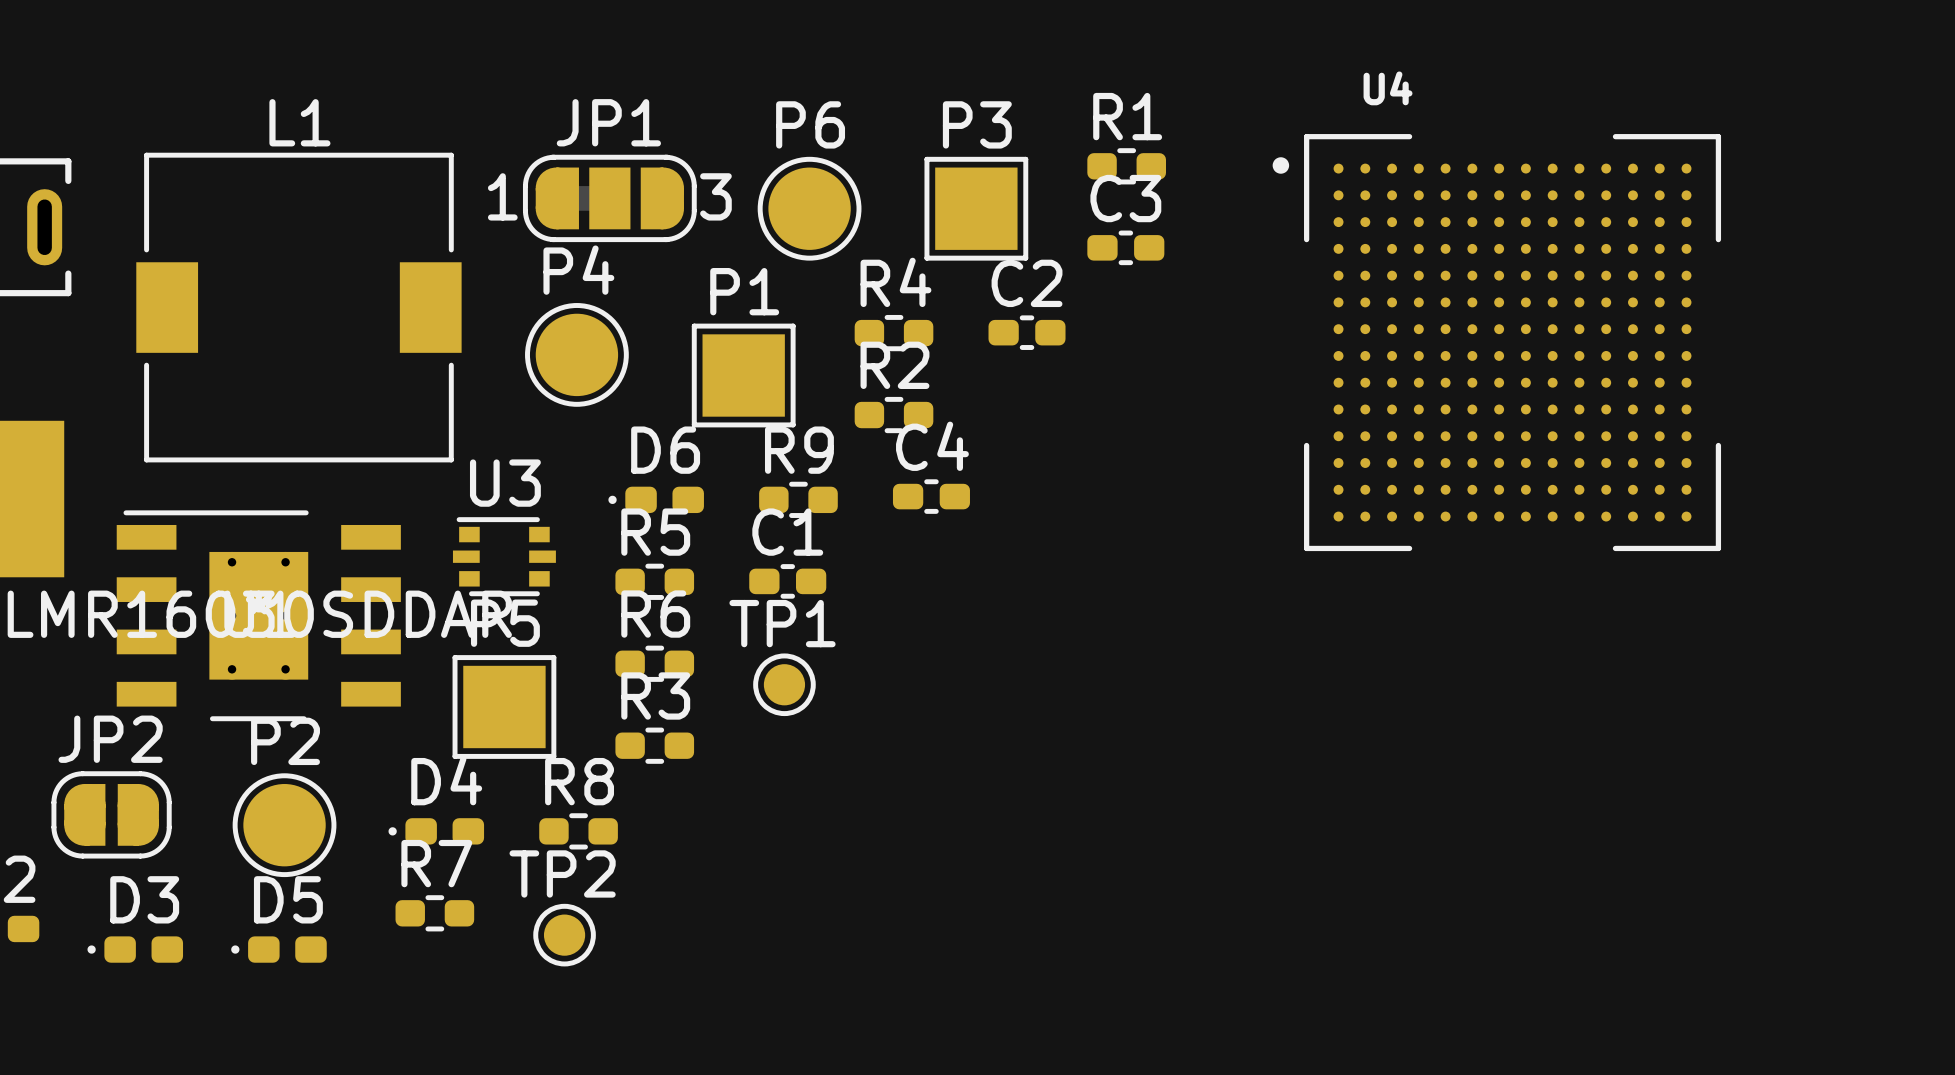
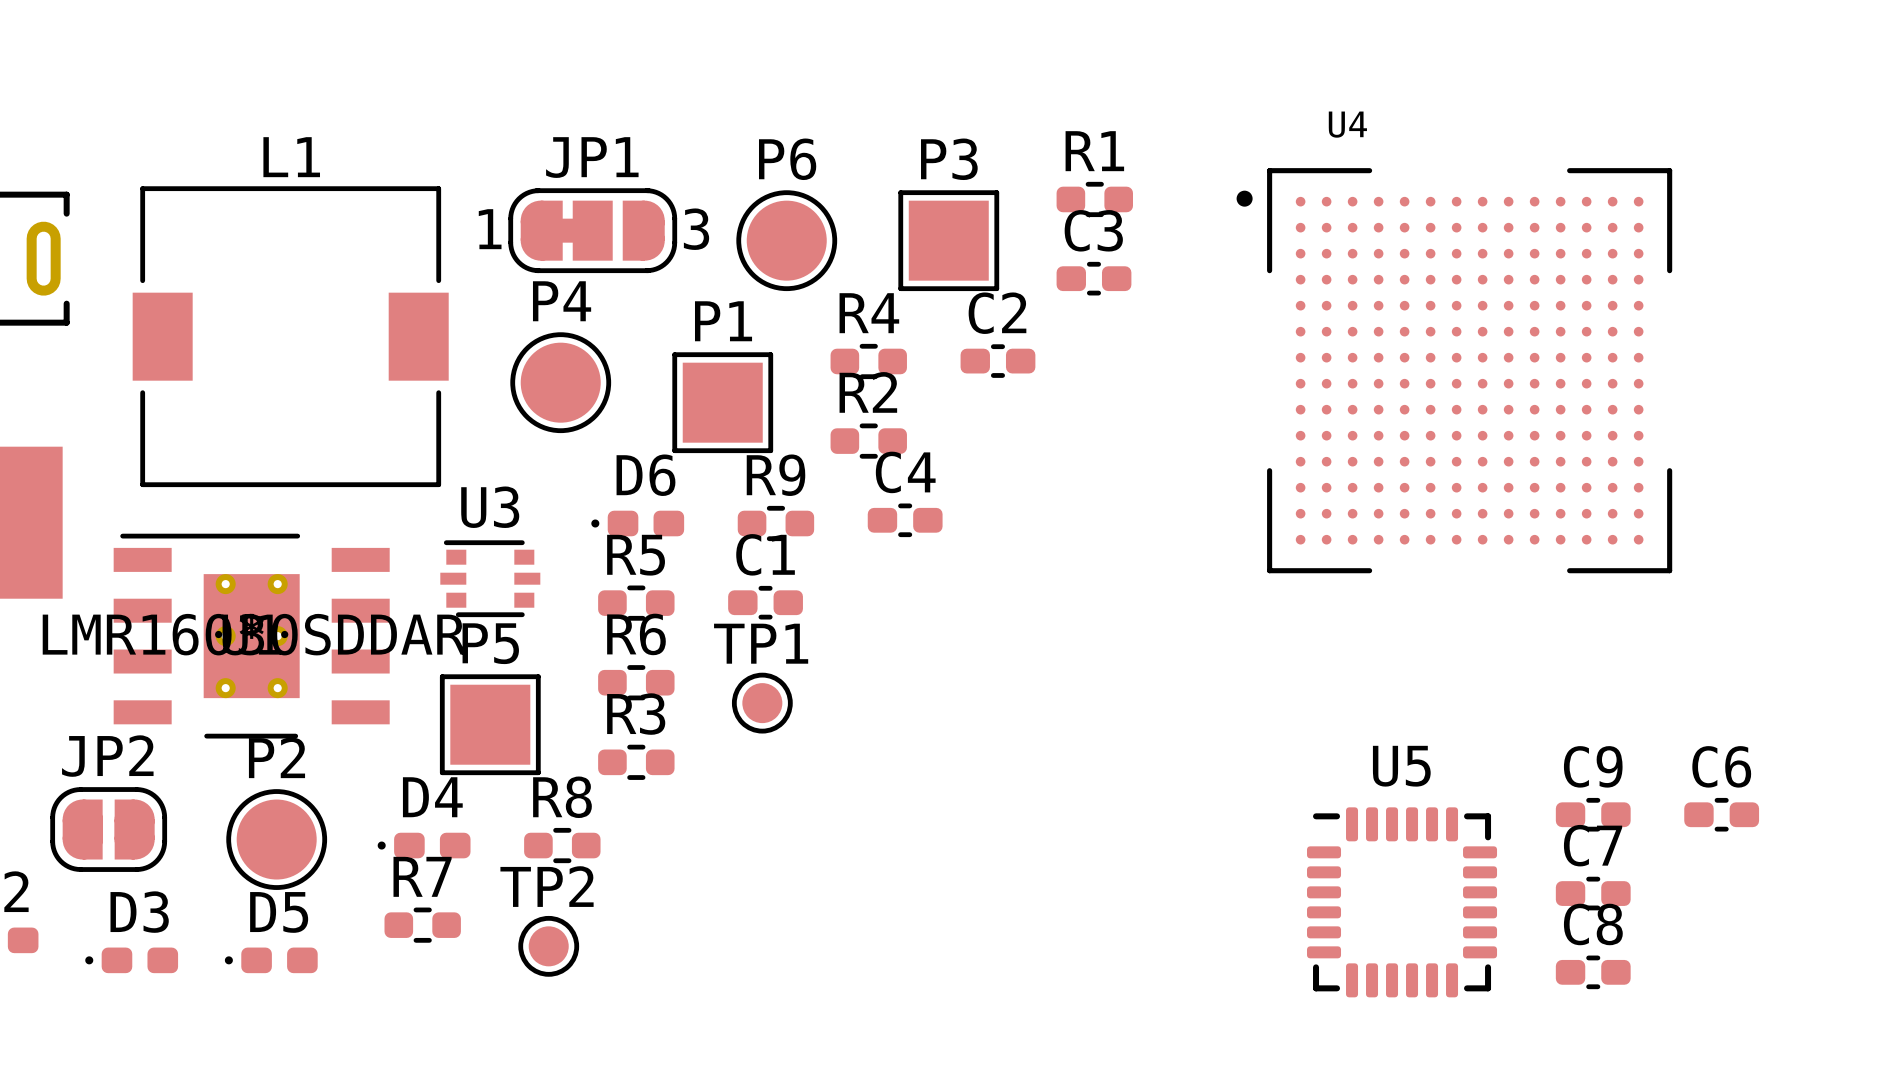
C9: none -> (1593, 814)
C6: none -> (1721, 814)
C7: none -> (1593, 893)
U5: none -> (1402, 902)
C8: none -> (1593, 972)

